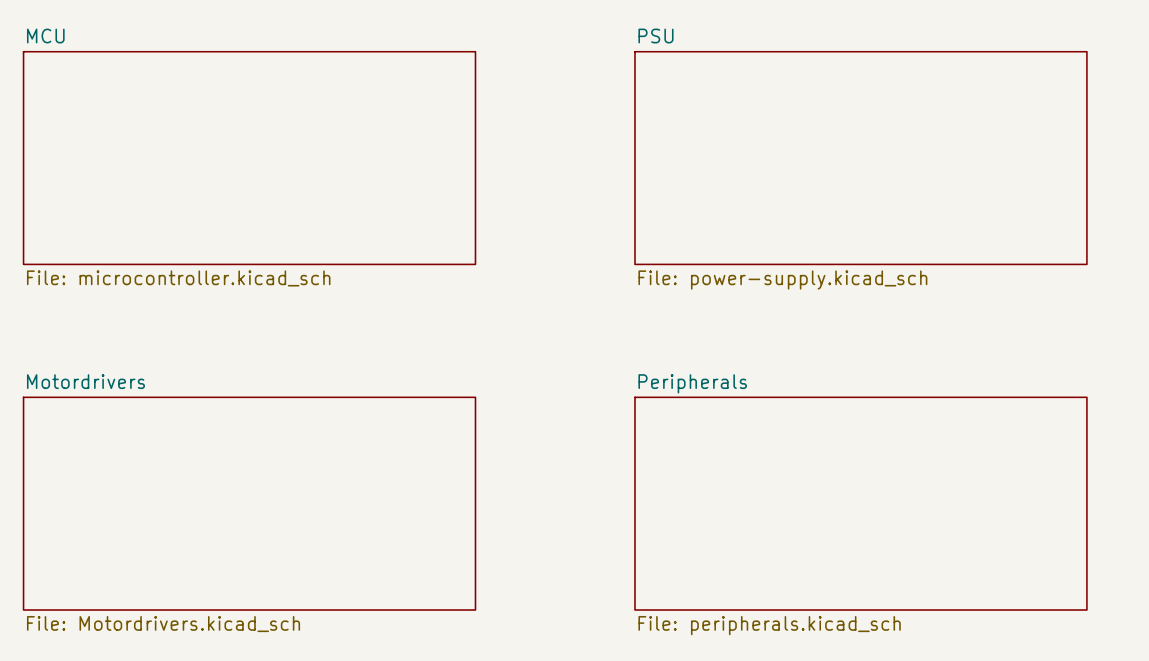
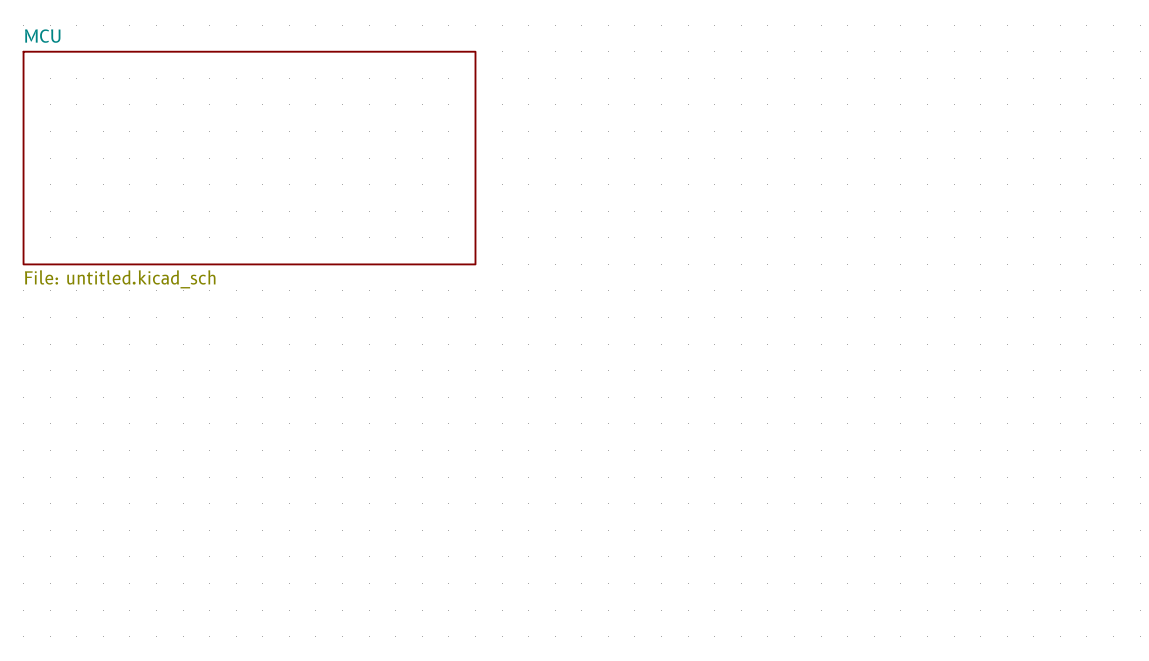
sheet PSU: File: power-supply.kicad_sch (860, 158) -> none
sheet MCU value: File: microcontroller.kicad_sch (178, 278) -> File: untitled.kicad_sch (120, 279)
sheet Motordrivers: File: Motordrivers.kicad_sch (249, 503) -> none
sheet Peripherals: File: peripherals.kicad_sch (860, 503) -> none

